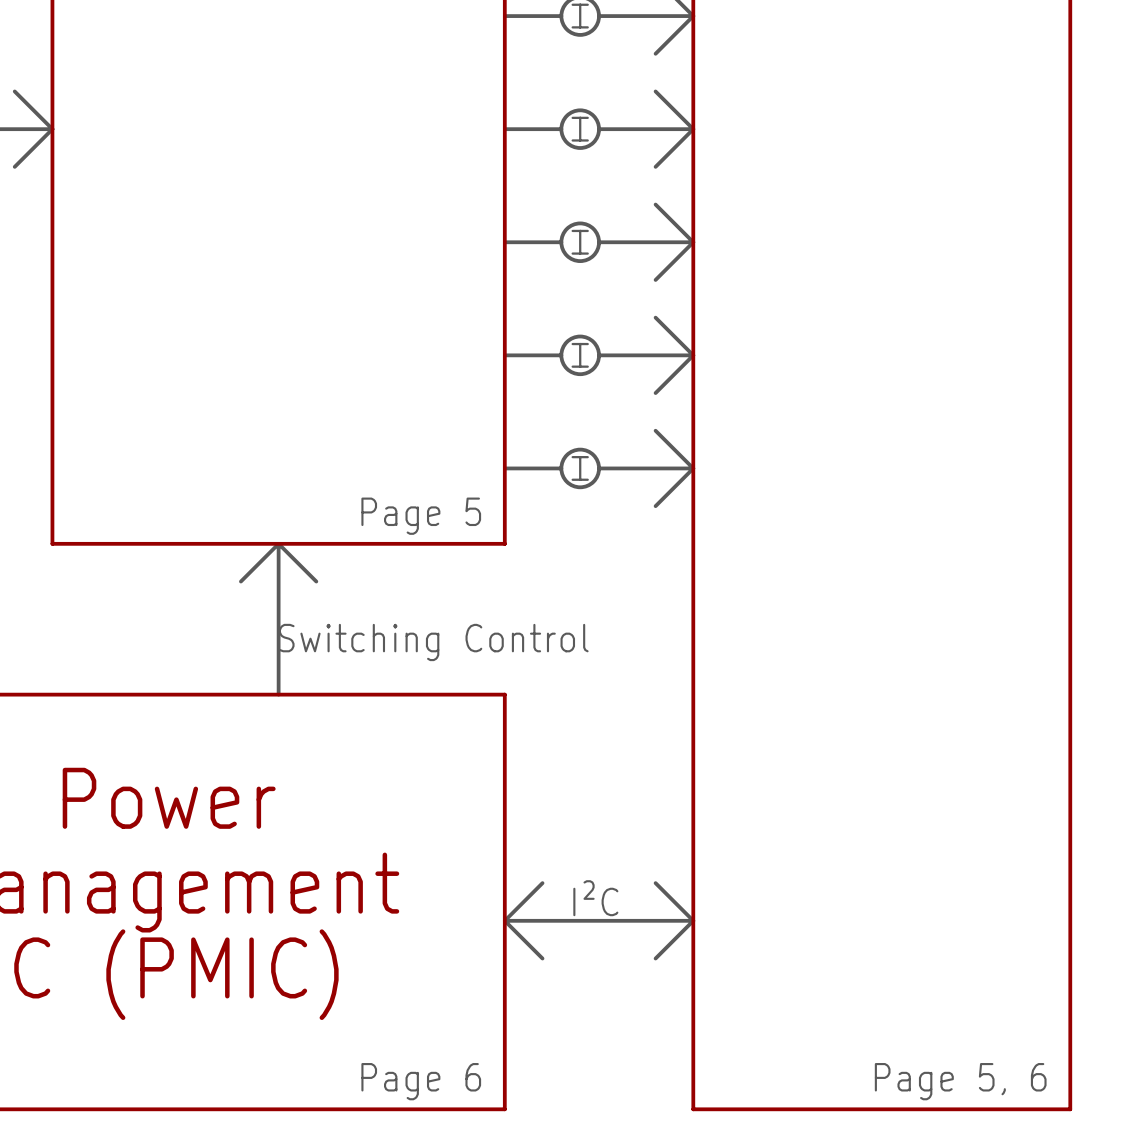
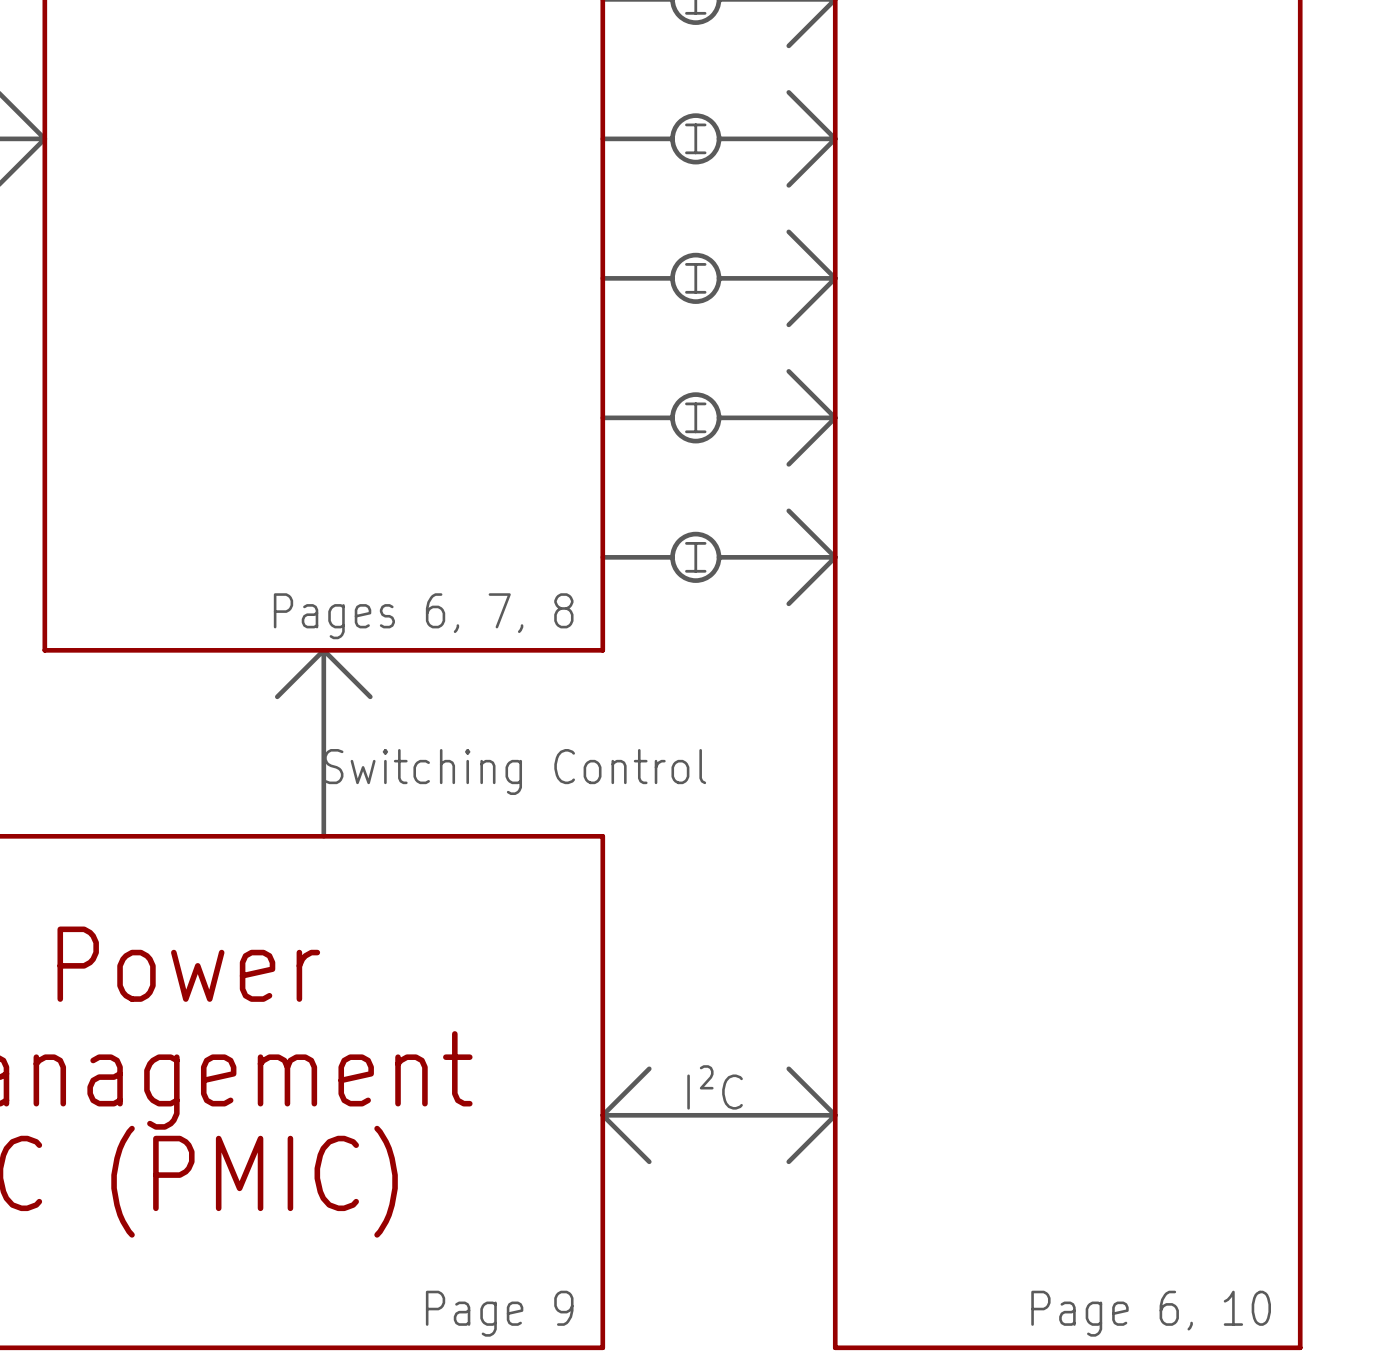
text: Page 5 (421, 516) -> Pages 6, 7, 8 (423, 616)
text: Page 6 (421, 1081) -> Page 9 (499, 1313)
text: Page 5, 6 (960, 1081) -> Page 6, 10 (1151, 1313)

